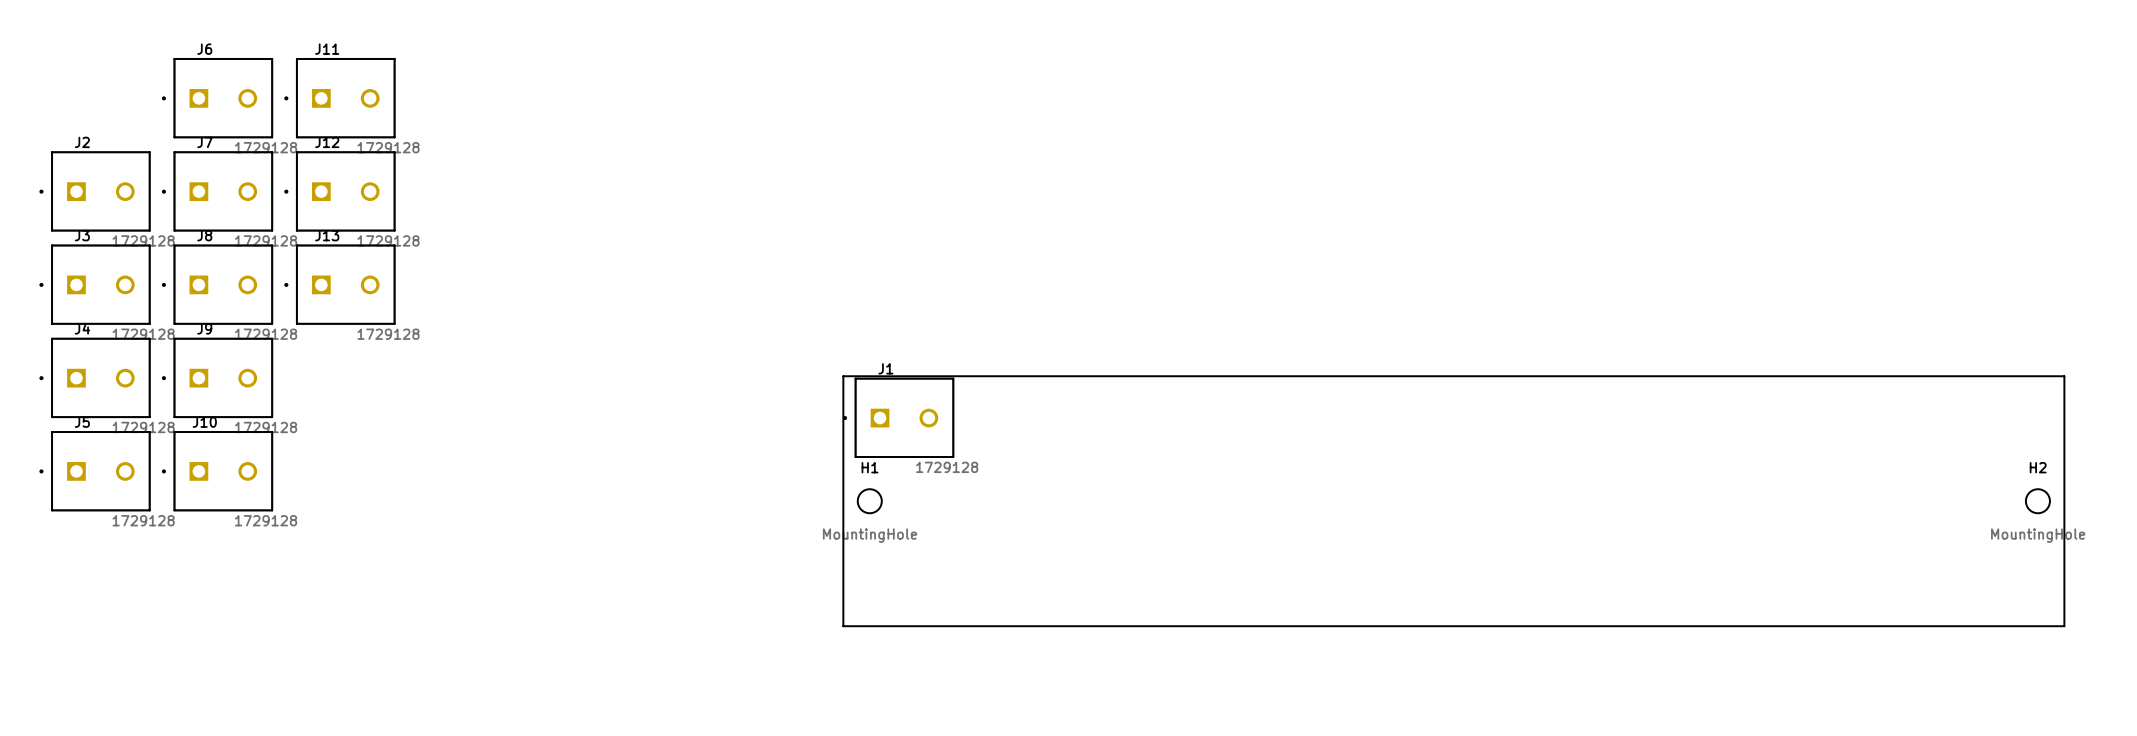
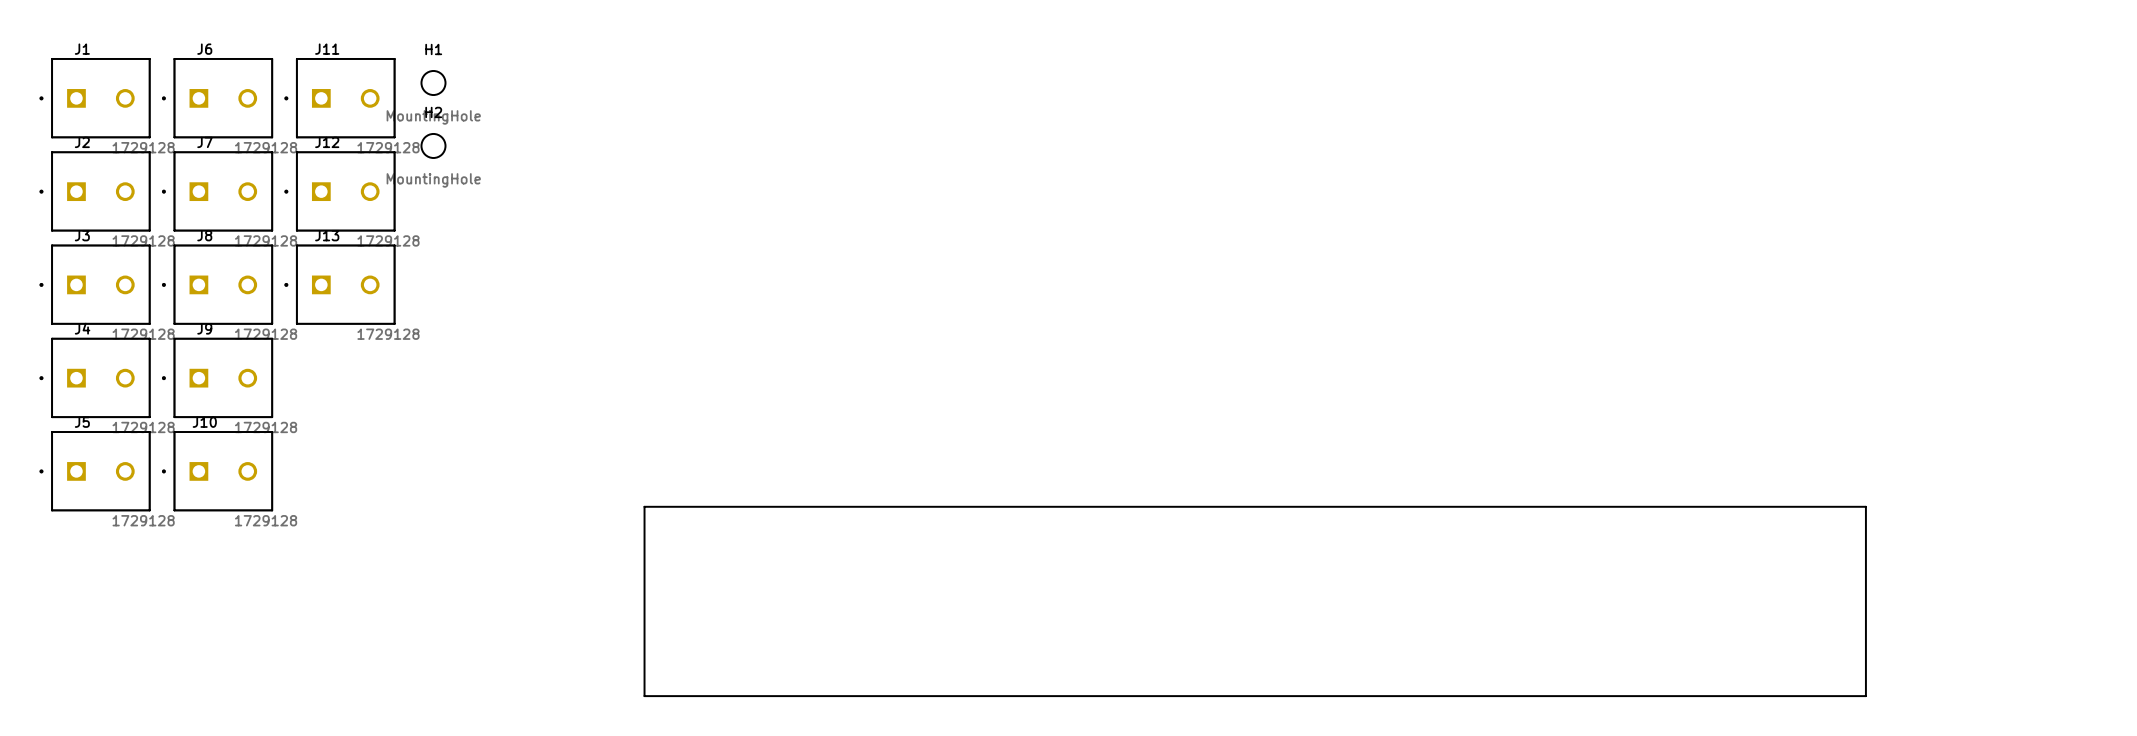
board edge: (843, 376) (2064, 376) (2064, 626) (843, 626) (843, 376) -> none
J1 position: (898, 417) -> (94, 98)
H1 position: (869, 501) -> (433, 83)
H2 position: (2037, 501) -> (433, 145)
board edge: none -> (644, 506) (1865, 506) (1865, 696) (644, 696) (644, 506)

